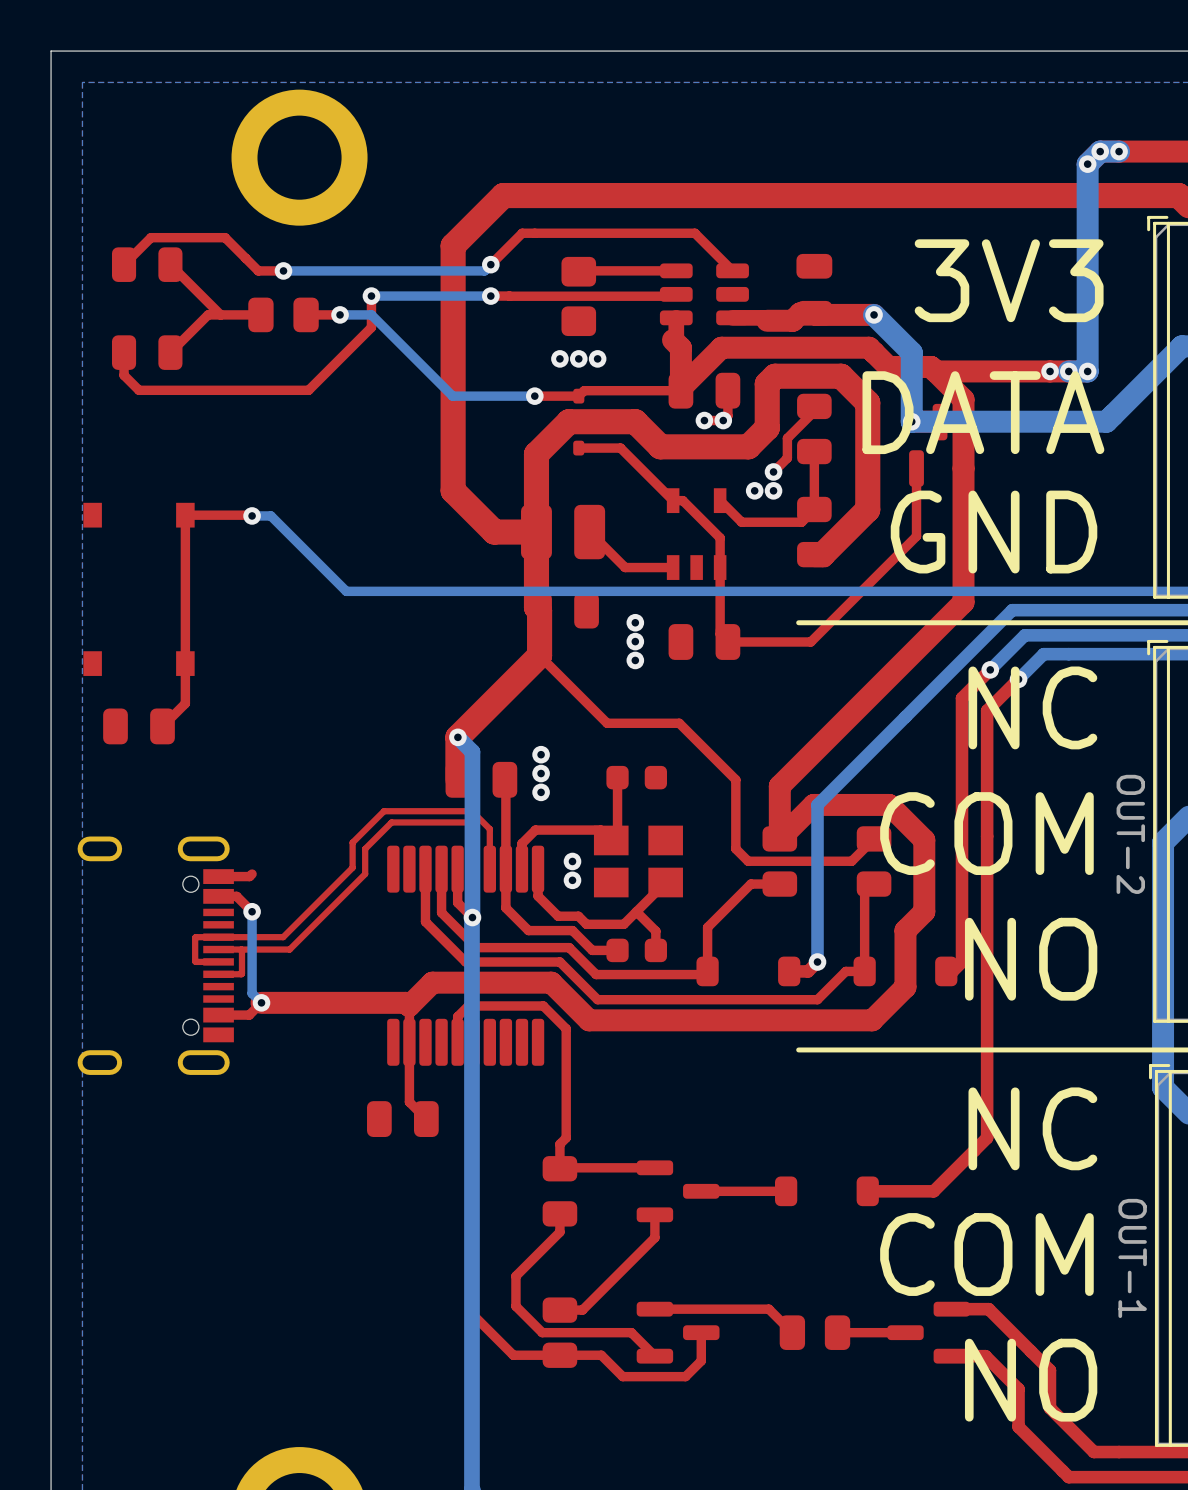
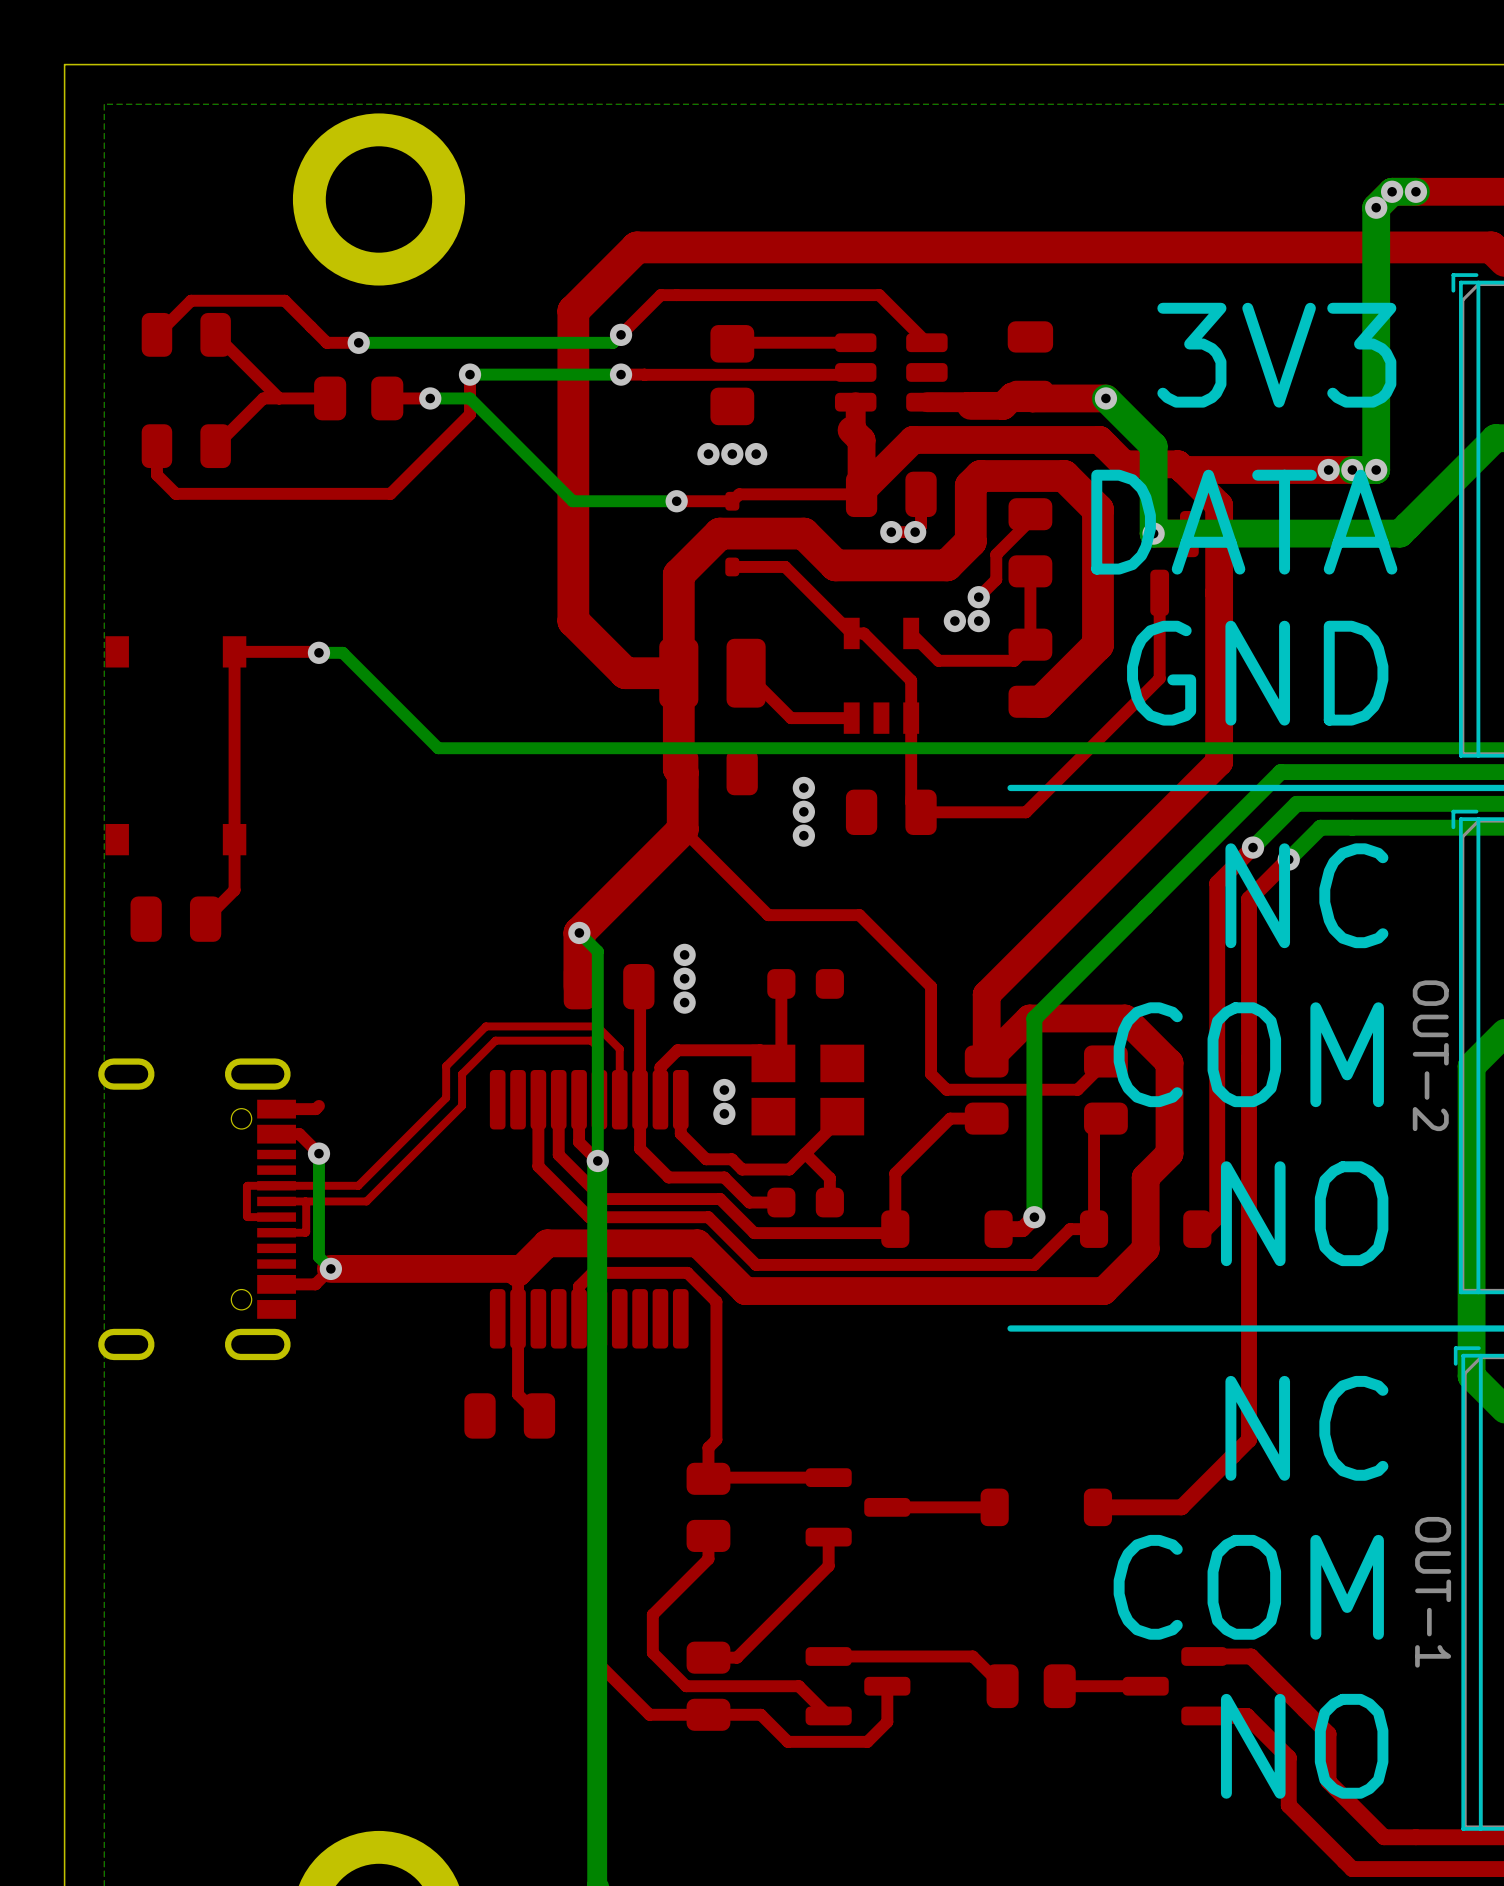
bottom track width: thick (457, 737) (472, 751) (472, 917) -> thin (579, 932) (597, 951) (597, 1160)

